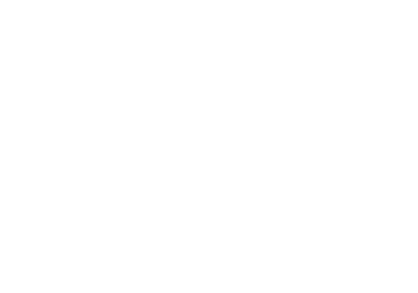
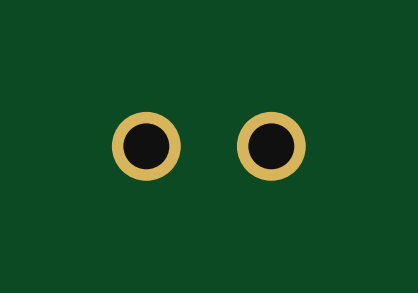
part: none -> (208, 146)

